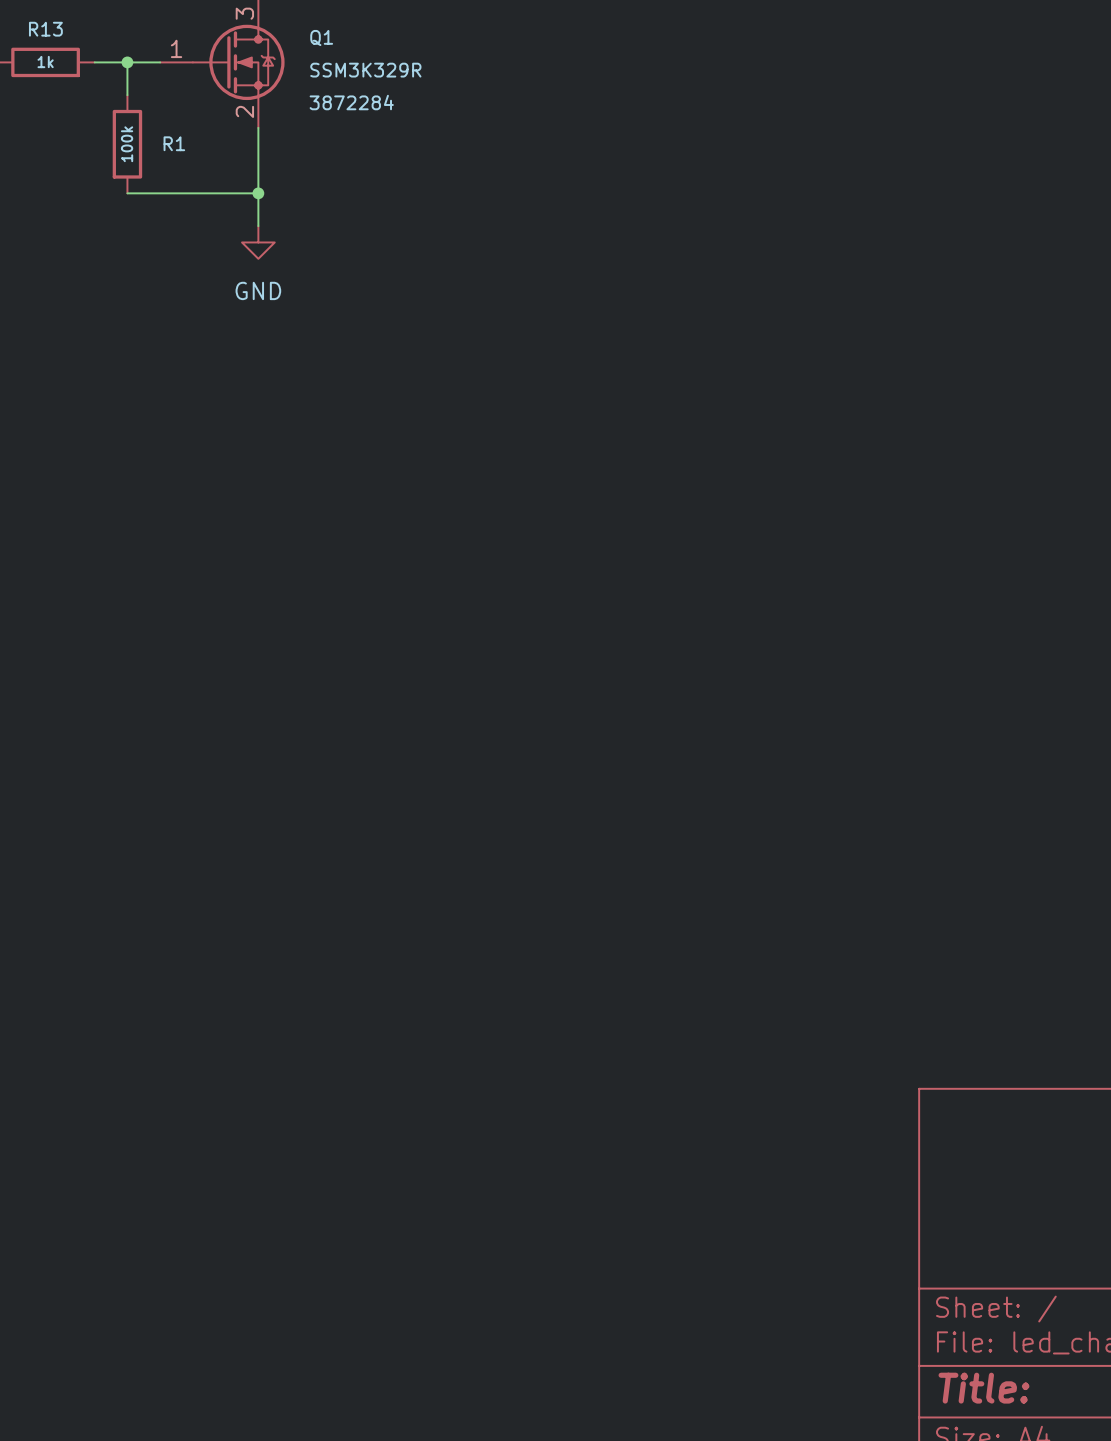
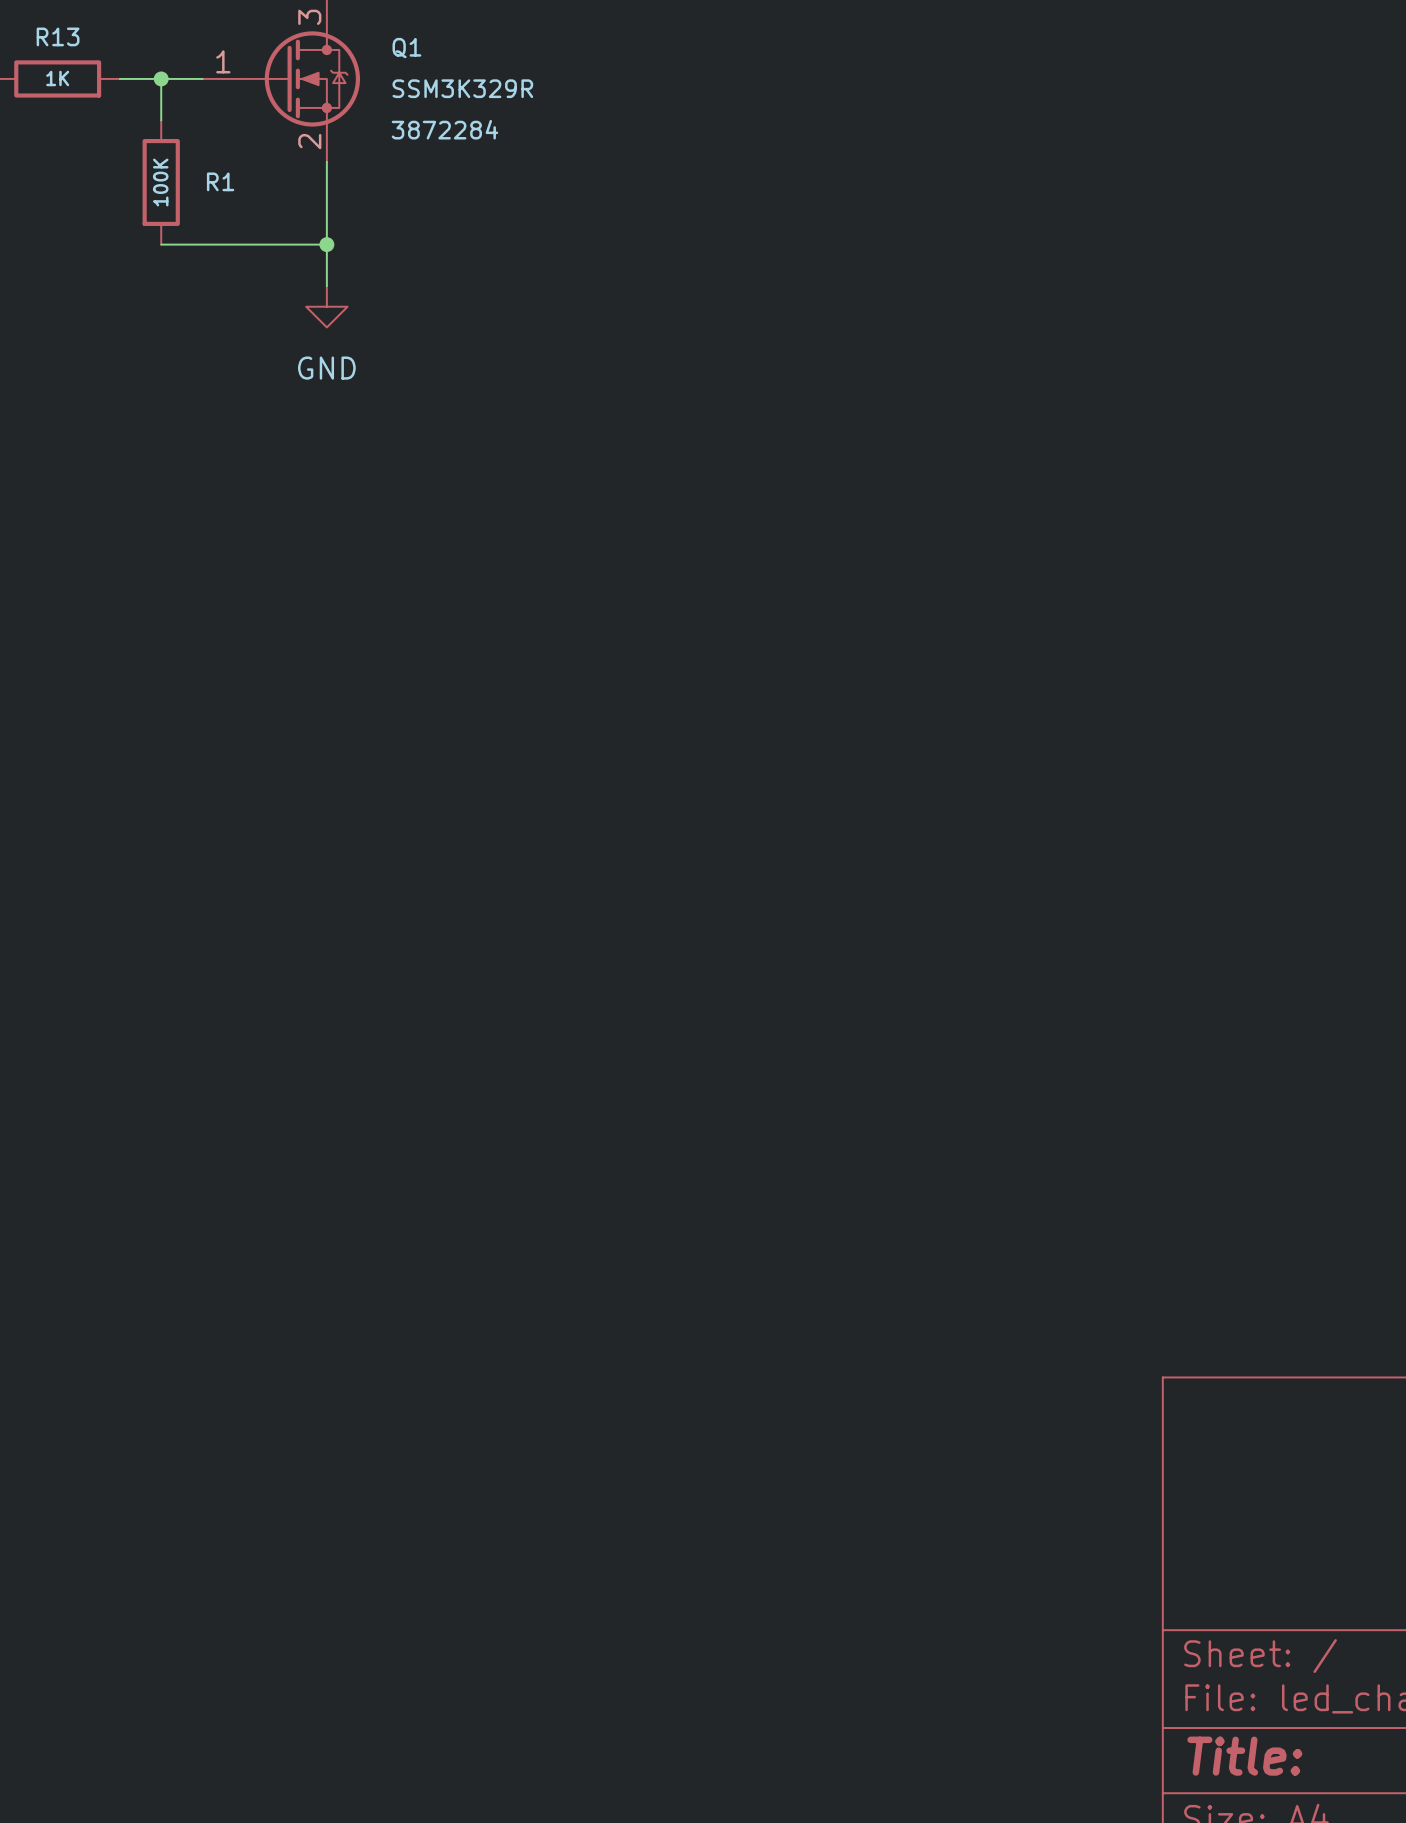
R13 value: 1k (45, 62) -> 1K (57, 78)
R1 value: 100k (127, 144) -> 100K (160, 182)

